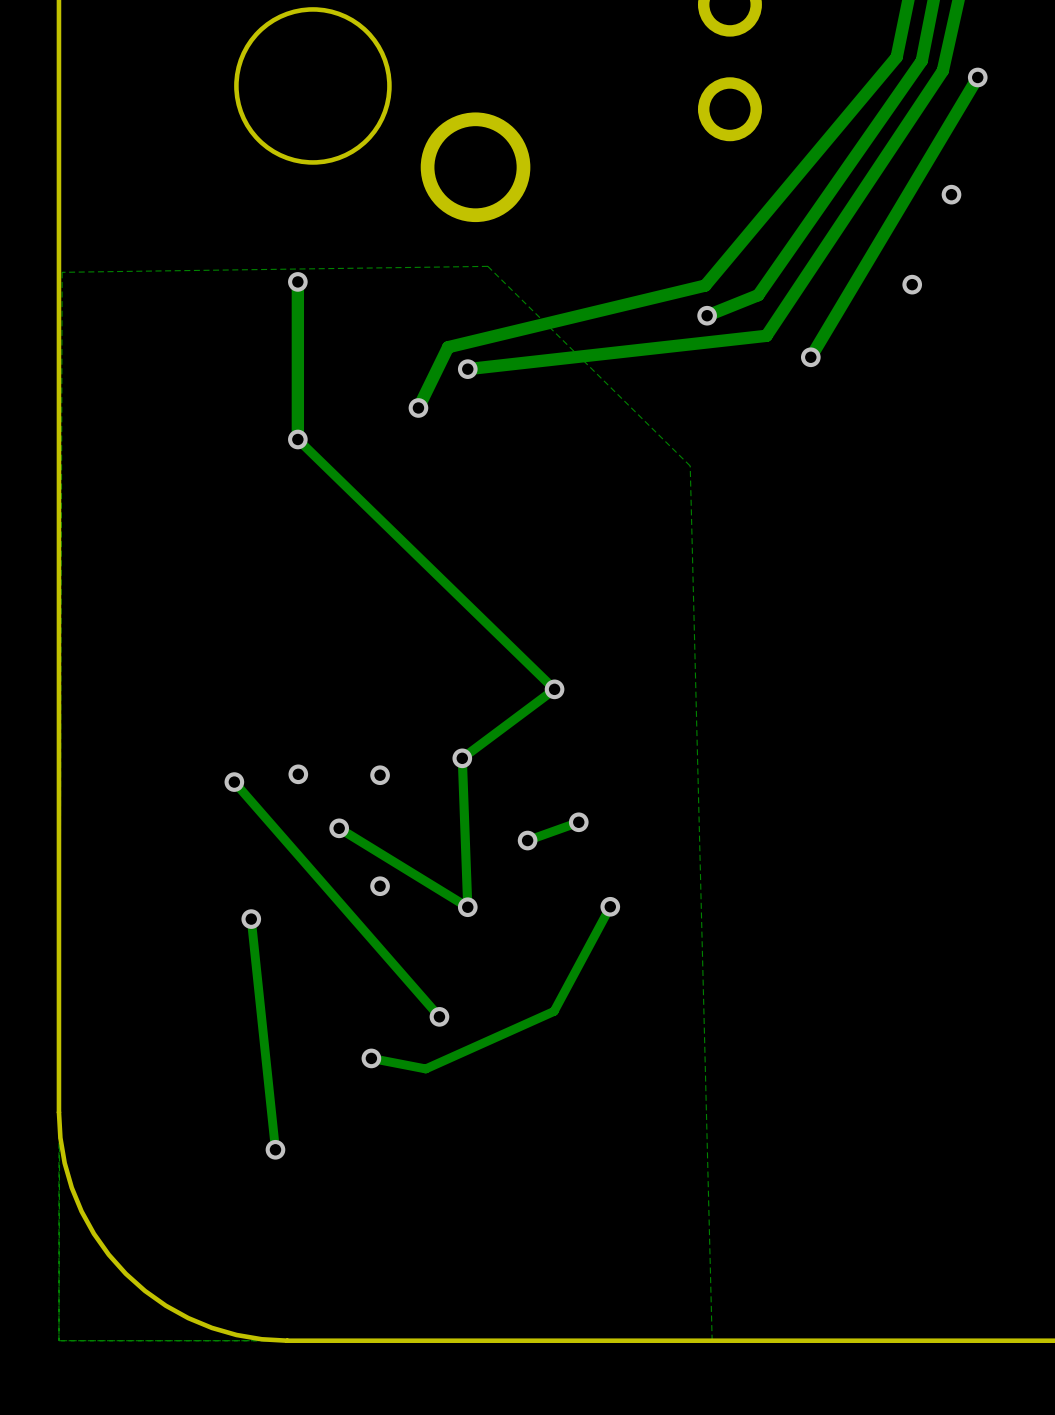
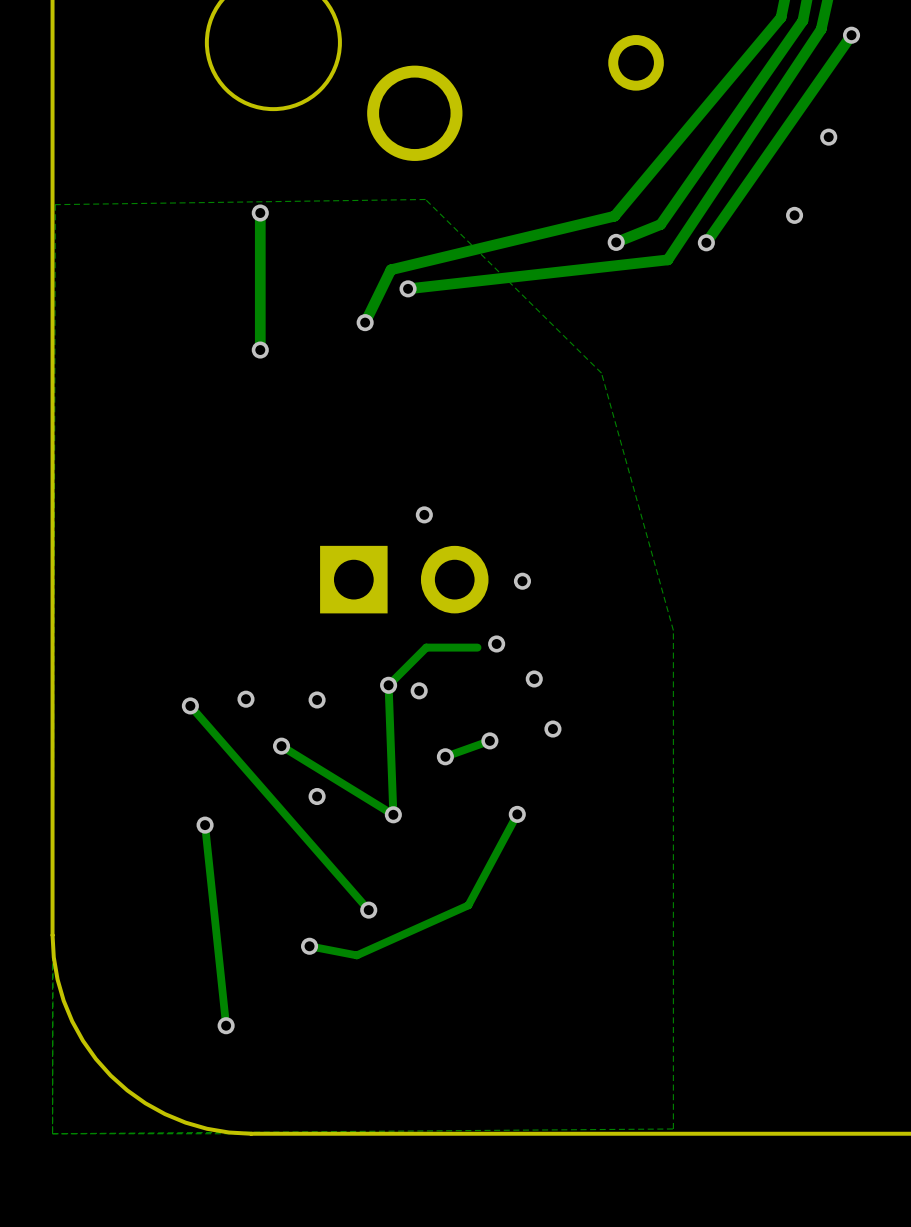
track: (977, 77) (810, 357) -> (851, 35) (706, 242)
via position: (810, 357) -> (706, 242)
track: (297, 439) (554, 689) (462, 758) (467, 907) (339, 828) -> none
zone outline: (690, 465) (712, 1340) -> (601, 373) (673, 630) (673, 1128) (52, 1133)
via: none -> (424, 514)
via: (554, 689) -> none
part: none -> (404, 579)
via: none -> (522, 581)
via: (462, 758) -> none
via: (298, 774) -> none
via: (380, 775) -> none
via: none -> (496, 643)
track: none -> (477, 647) (426, 647) (388, 685) (393, 814) (281, 746)
track: (234, 782) (439, 1016) -> (190, 705) (368, 910)
via: (234, 782) -> none
via: none -> (534, 678)
track: (578, 822) (527, 840) -> (489, 740) (445, 756)
via: (578, 822) -> none
via: none -> (388, 685)
via: (339, 828) -> none
via: none -> (419, 690)
via: (527, 840) -> none
via: none -> (245, 699)
via: none -> (317, 699)
via: none -> (190, 705)
via: none -> (552, 729)
via: (380, 886) -> none
via: none -> (489, 740)
via: none -> (281, 746)
track: (610, 906) (554, 1011) (425, 1068) (371, 1058) -> (517, 814) (468, 905) (356, 955) (309, 946)
via: (610, 906) -> none
via: (467, 907) -> none
via: none -> (445, 756)
track: (251, 919) (275, 1149) -> (205, 825) (226, 1025)
via: (251, 919) -> none
via: none -> (317, 796)
via: none -> (393, 814)
via: none -> (517, 814)
via: none -> (205, 825)
via: (439, 1016) -> none
via: (371, 1058) -> none
via: none -> (368, 910)
via: none -> (309, 946)
via: (275, 1149) -> none
via: none -> (226, 1025)

